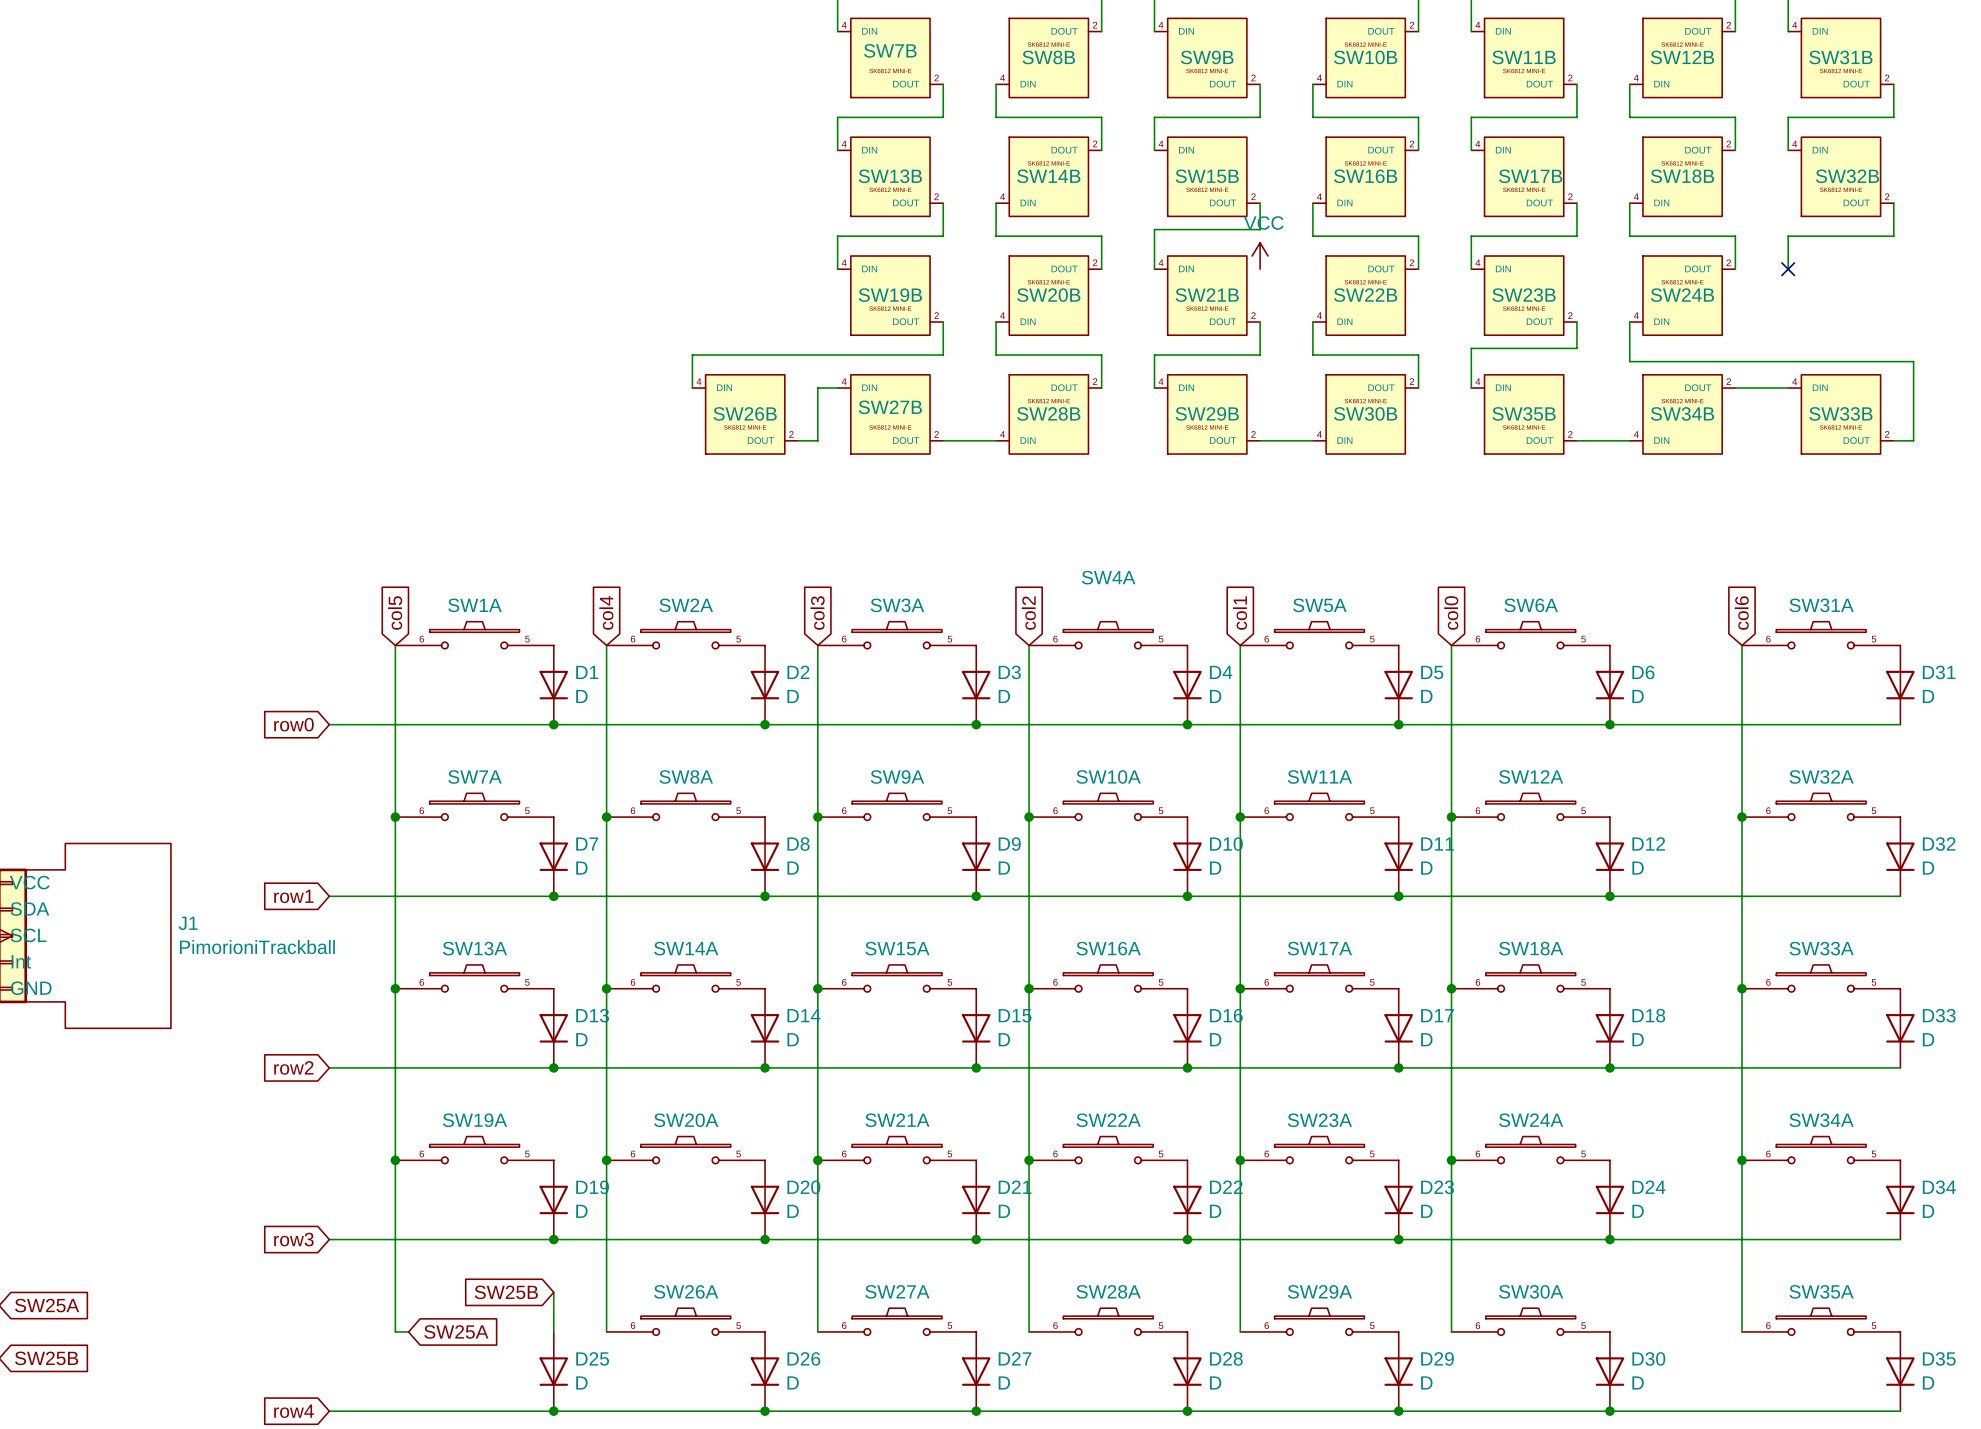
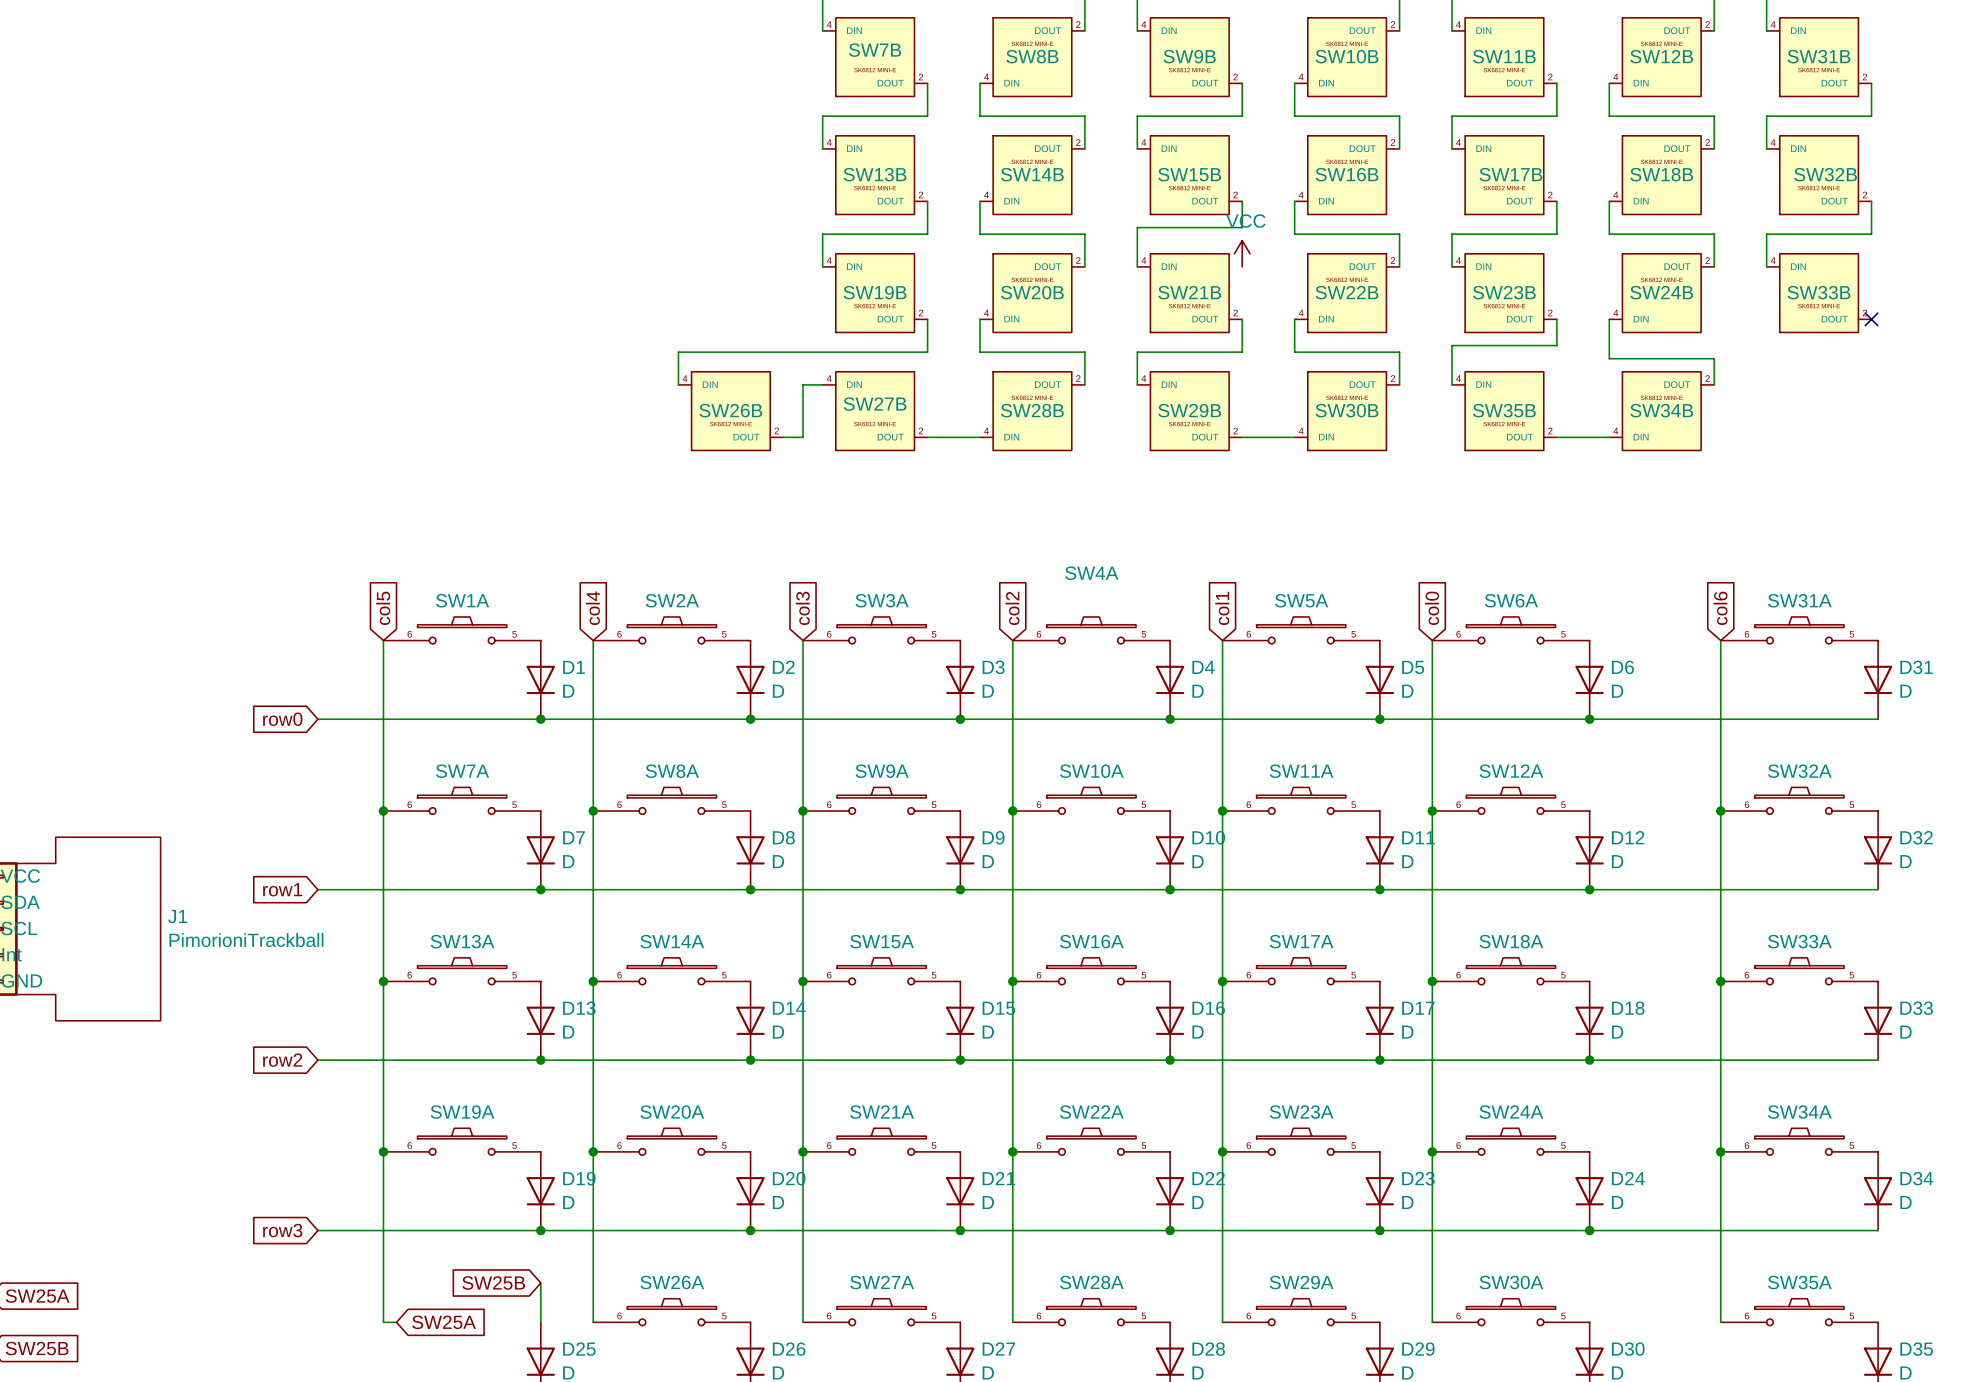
no-connect mark: (1788, 269) -> none
no-connect mark: none -> (1871, 319)
wire: (1735, 361) (1913, 361) (1913, 440) (1893, 440) -> none
wire: (1735, 388) (1788, 388) -> (1714, 384) (1714, 358)
SW33B position: (1840, 414) -> (1819, 293)

